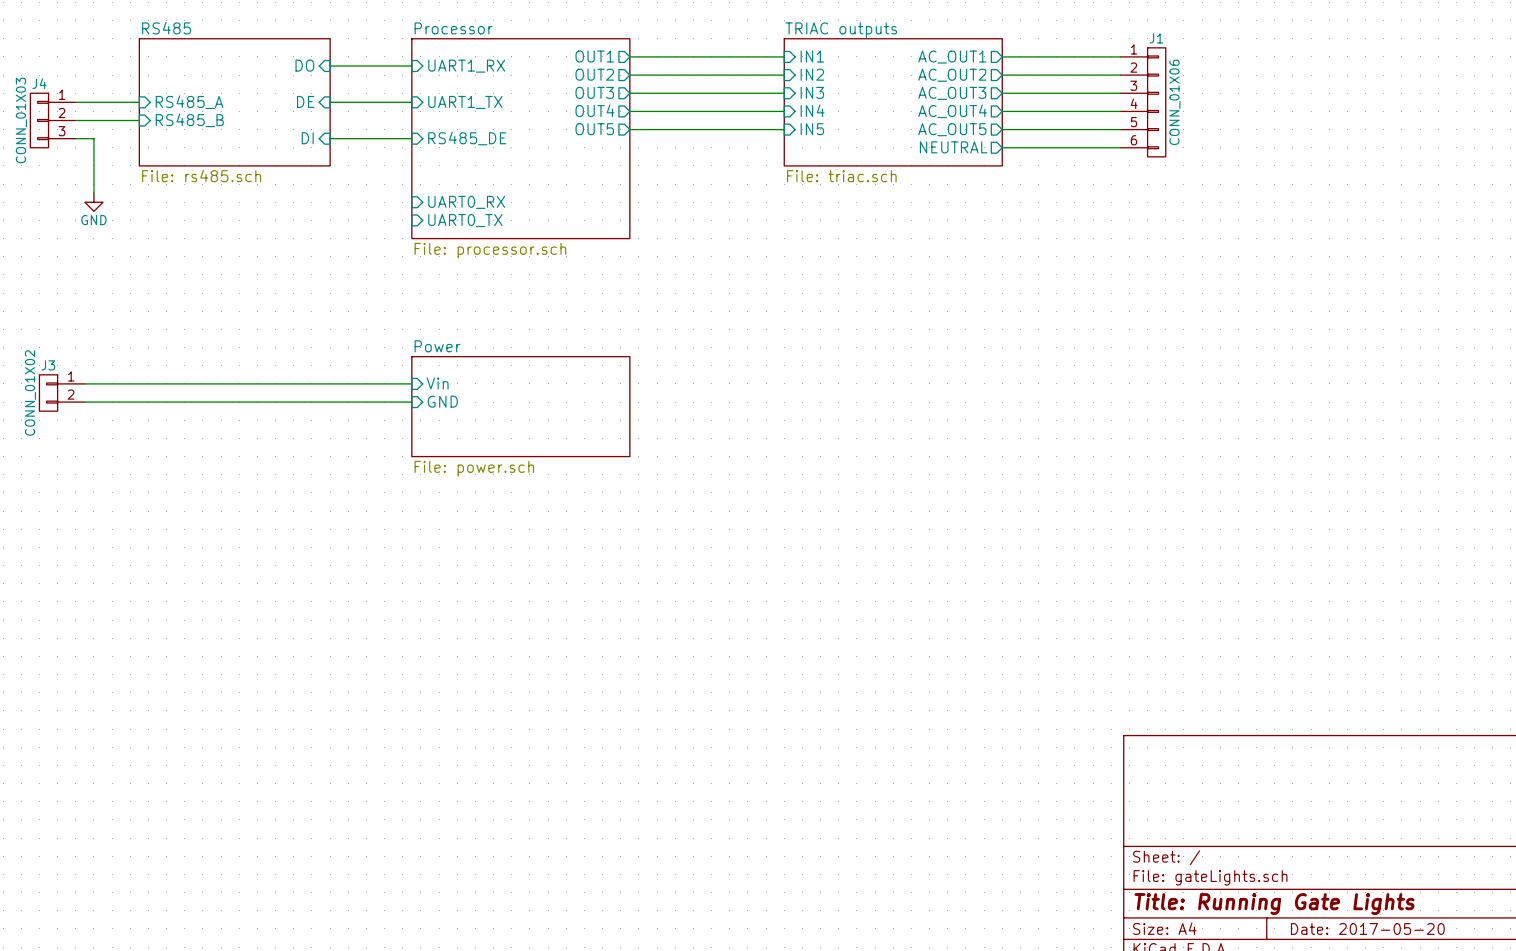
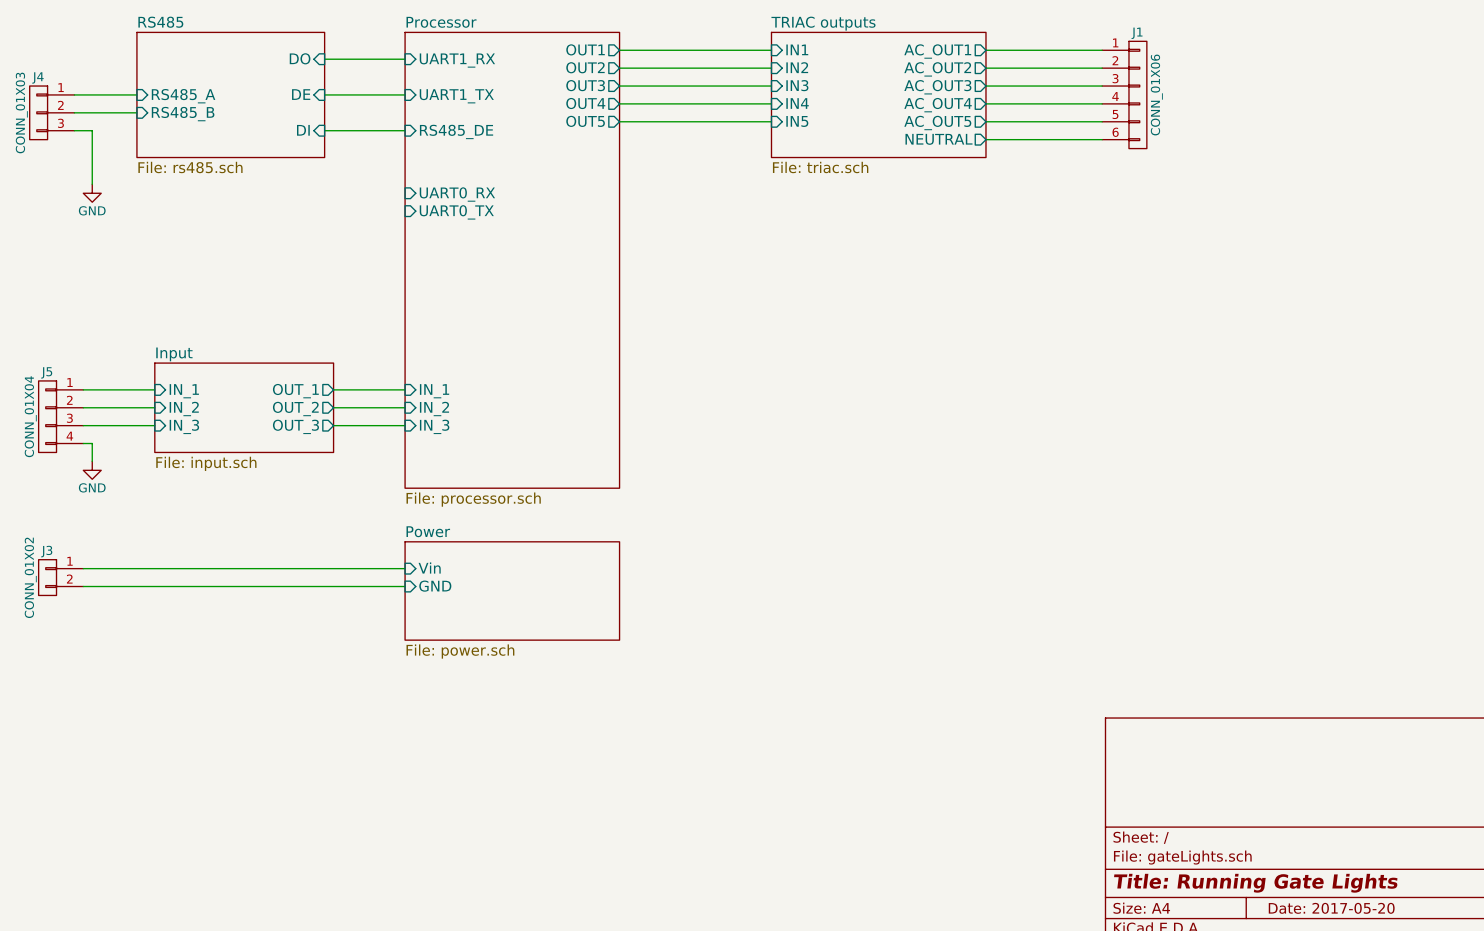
sheet Processor: File: processor.sch (520, 138) -> none
sheet Processor: none -> File: processor.sch (512, 260)
wire: (84, 383) (411, 383) -> none
sheet pin: Vin (437, 383) -> none
J3 position: (62, 393) -> (60, 577)
sheet pin: GND (442, 401) -> IN_1 (434, 391)
wire: (157, 402) (339, 402) -> none
sheet pin: none -> IN_1 (184, 391)
sheet pin: none -> OUT_1 (295, 391)
sheet Power: File: power.sch (520, 406) -> none
wire: none -> (83, 407) (154, 407)
sheet pin: none -> IN_2 (184, 409)
sheet Input: none -> File: input.sch (244, 407)
sheet pin: none -> OUT_2 (295, 409)
wire: none -> (333, 407) (405, 407)
sheet pin: none -> IN_2 (434, 409)
J5: none -> CONN_01X04 (60, 416)
wire: none -> (83, 425) (154, 425)
sheet pin: none -> IN_3 (184, 426)
sheet pin: none -> OUT_3 (295, 426)
wire: none -> (333, 425) (405, 425)
sheet pin: none -> IN_3 (434, 426)
wire: none -> (83, 443) (92, 443) (92, 461)
power symbol: none -> GND (92, 470)
wire: none -> (83, 568) (405, 568)
sheet pin: none -> Vin (429, 568)
wire: none -> (83, 586) (405, 586)
sheet pin: none -> GND (435, 586)
sheet Power: none -> File: power.sch (512, 590)

